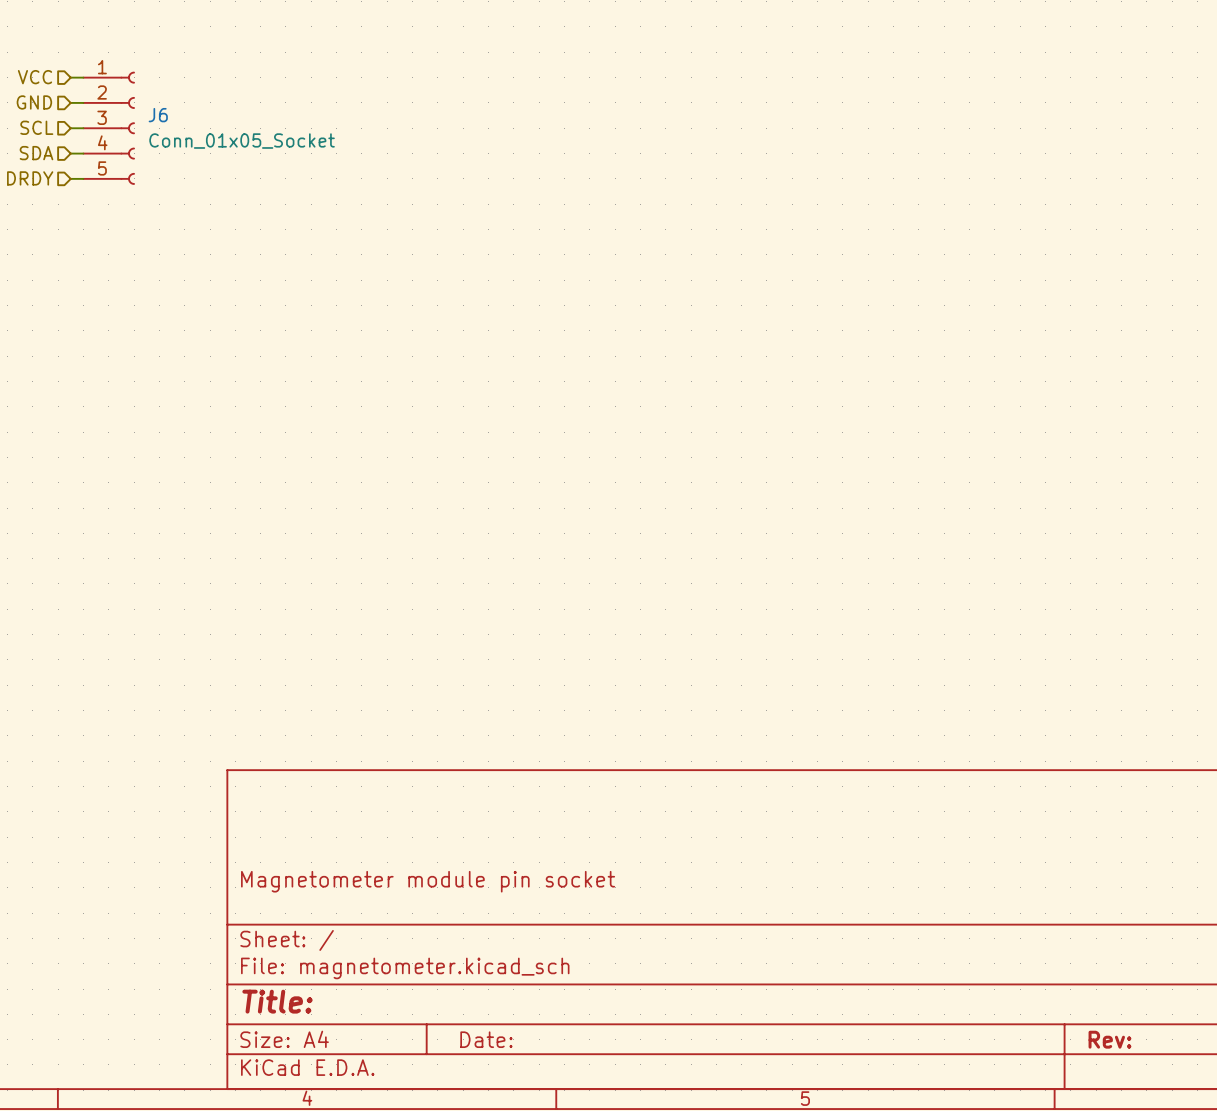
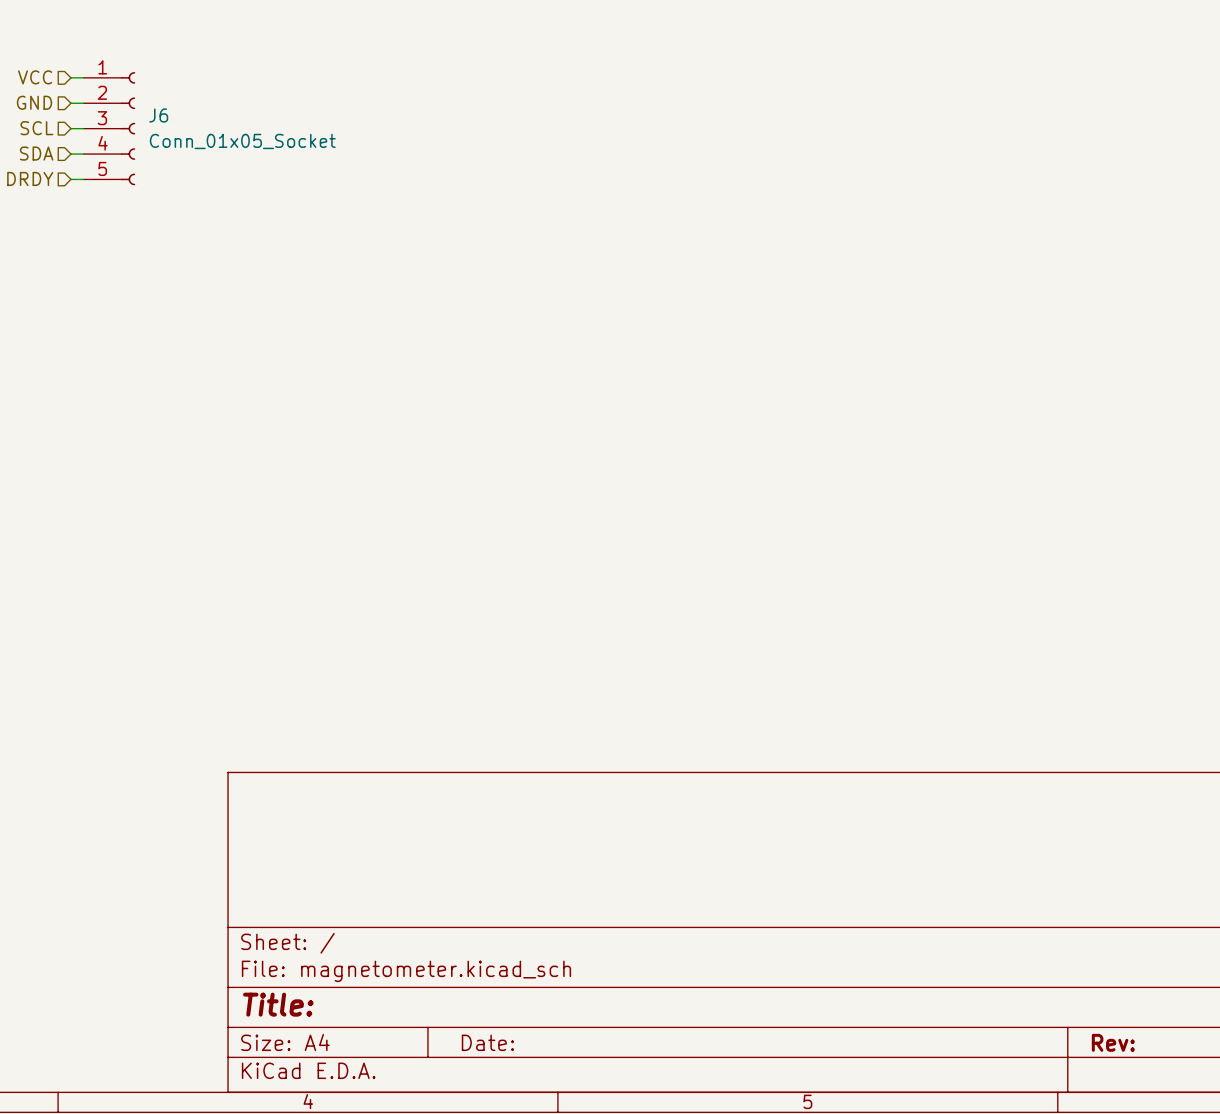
title block: Magnetometer module pin socket (428, 881) -> none

